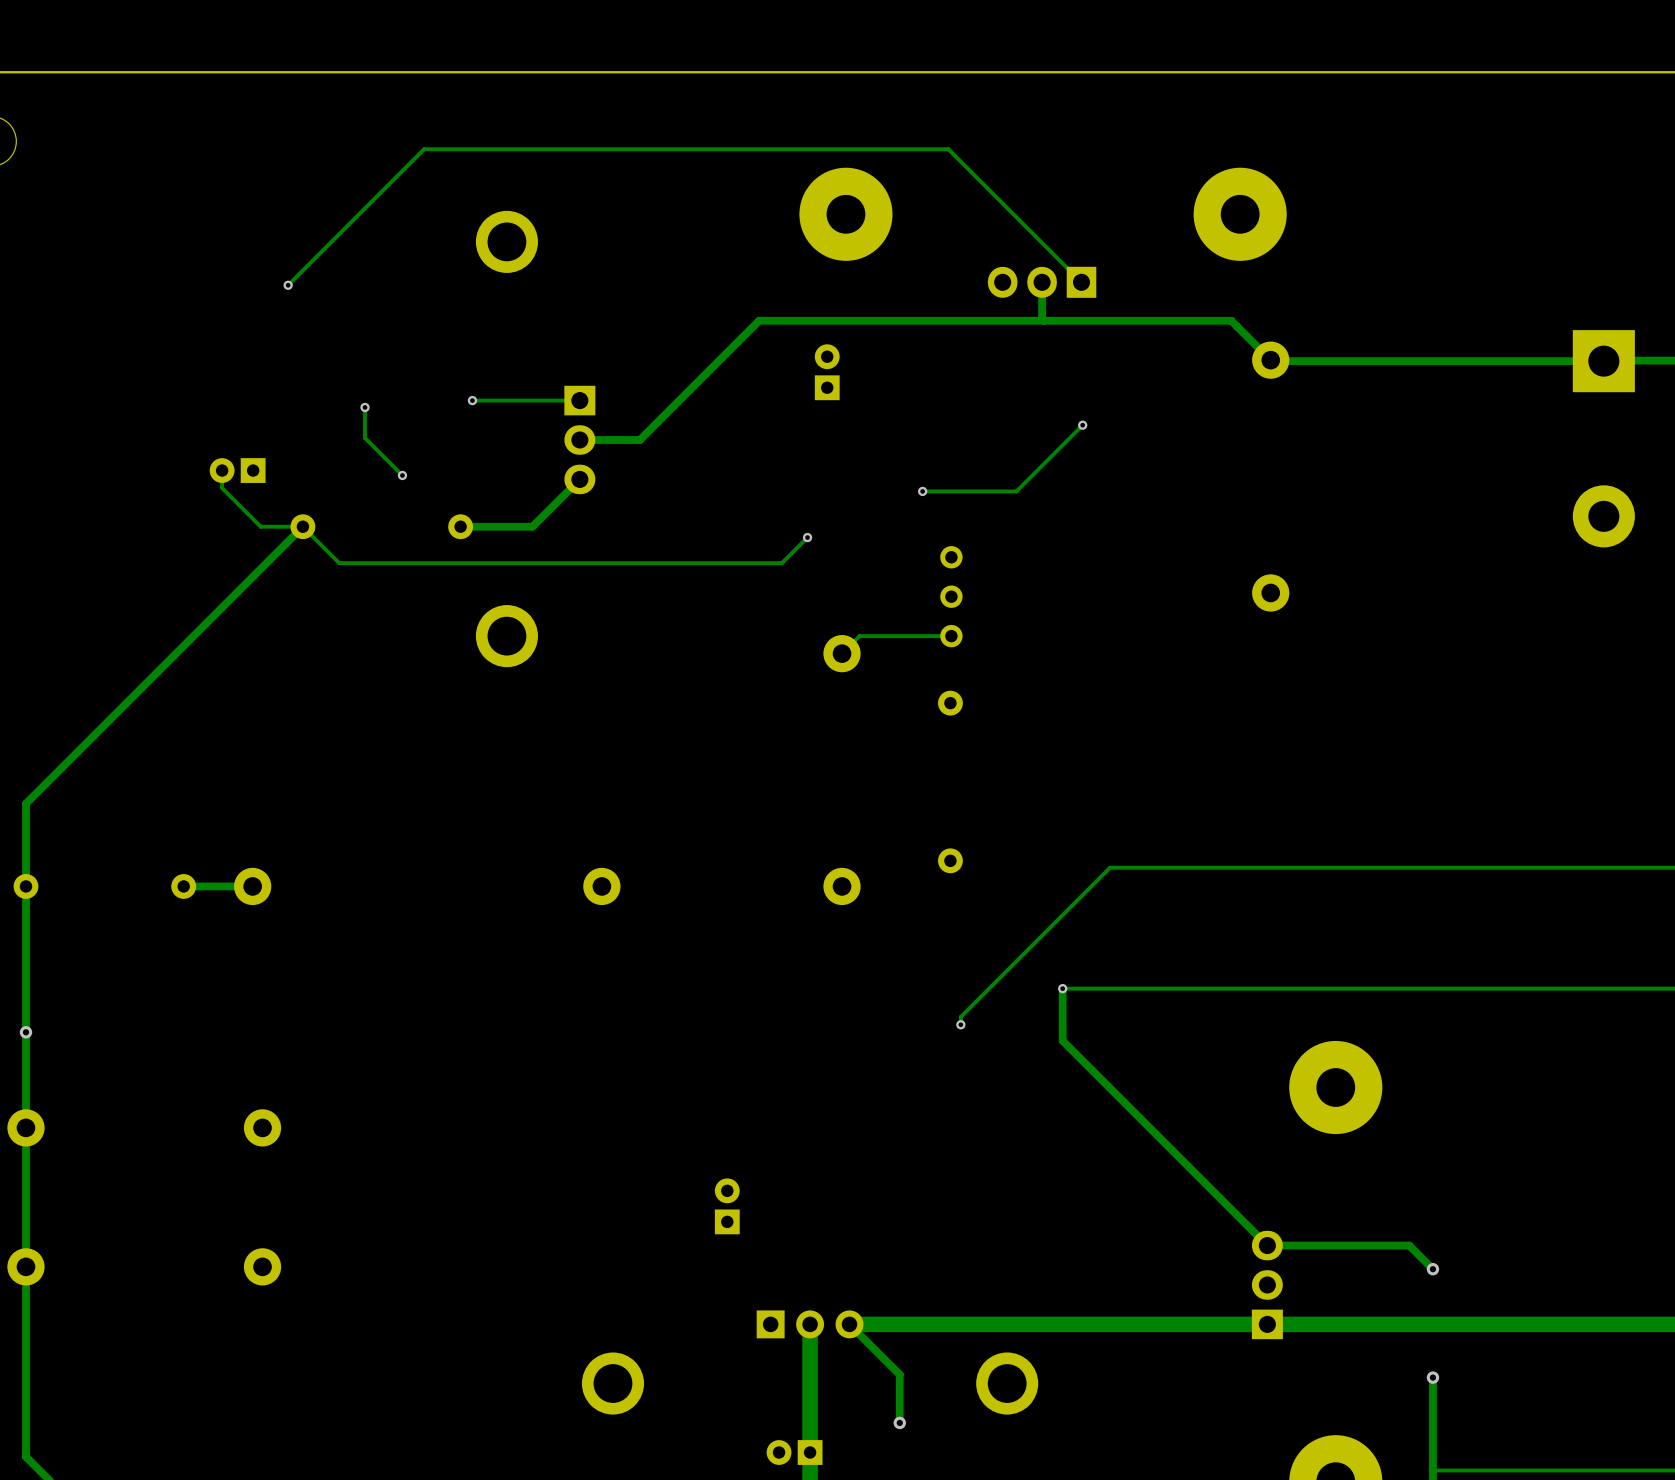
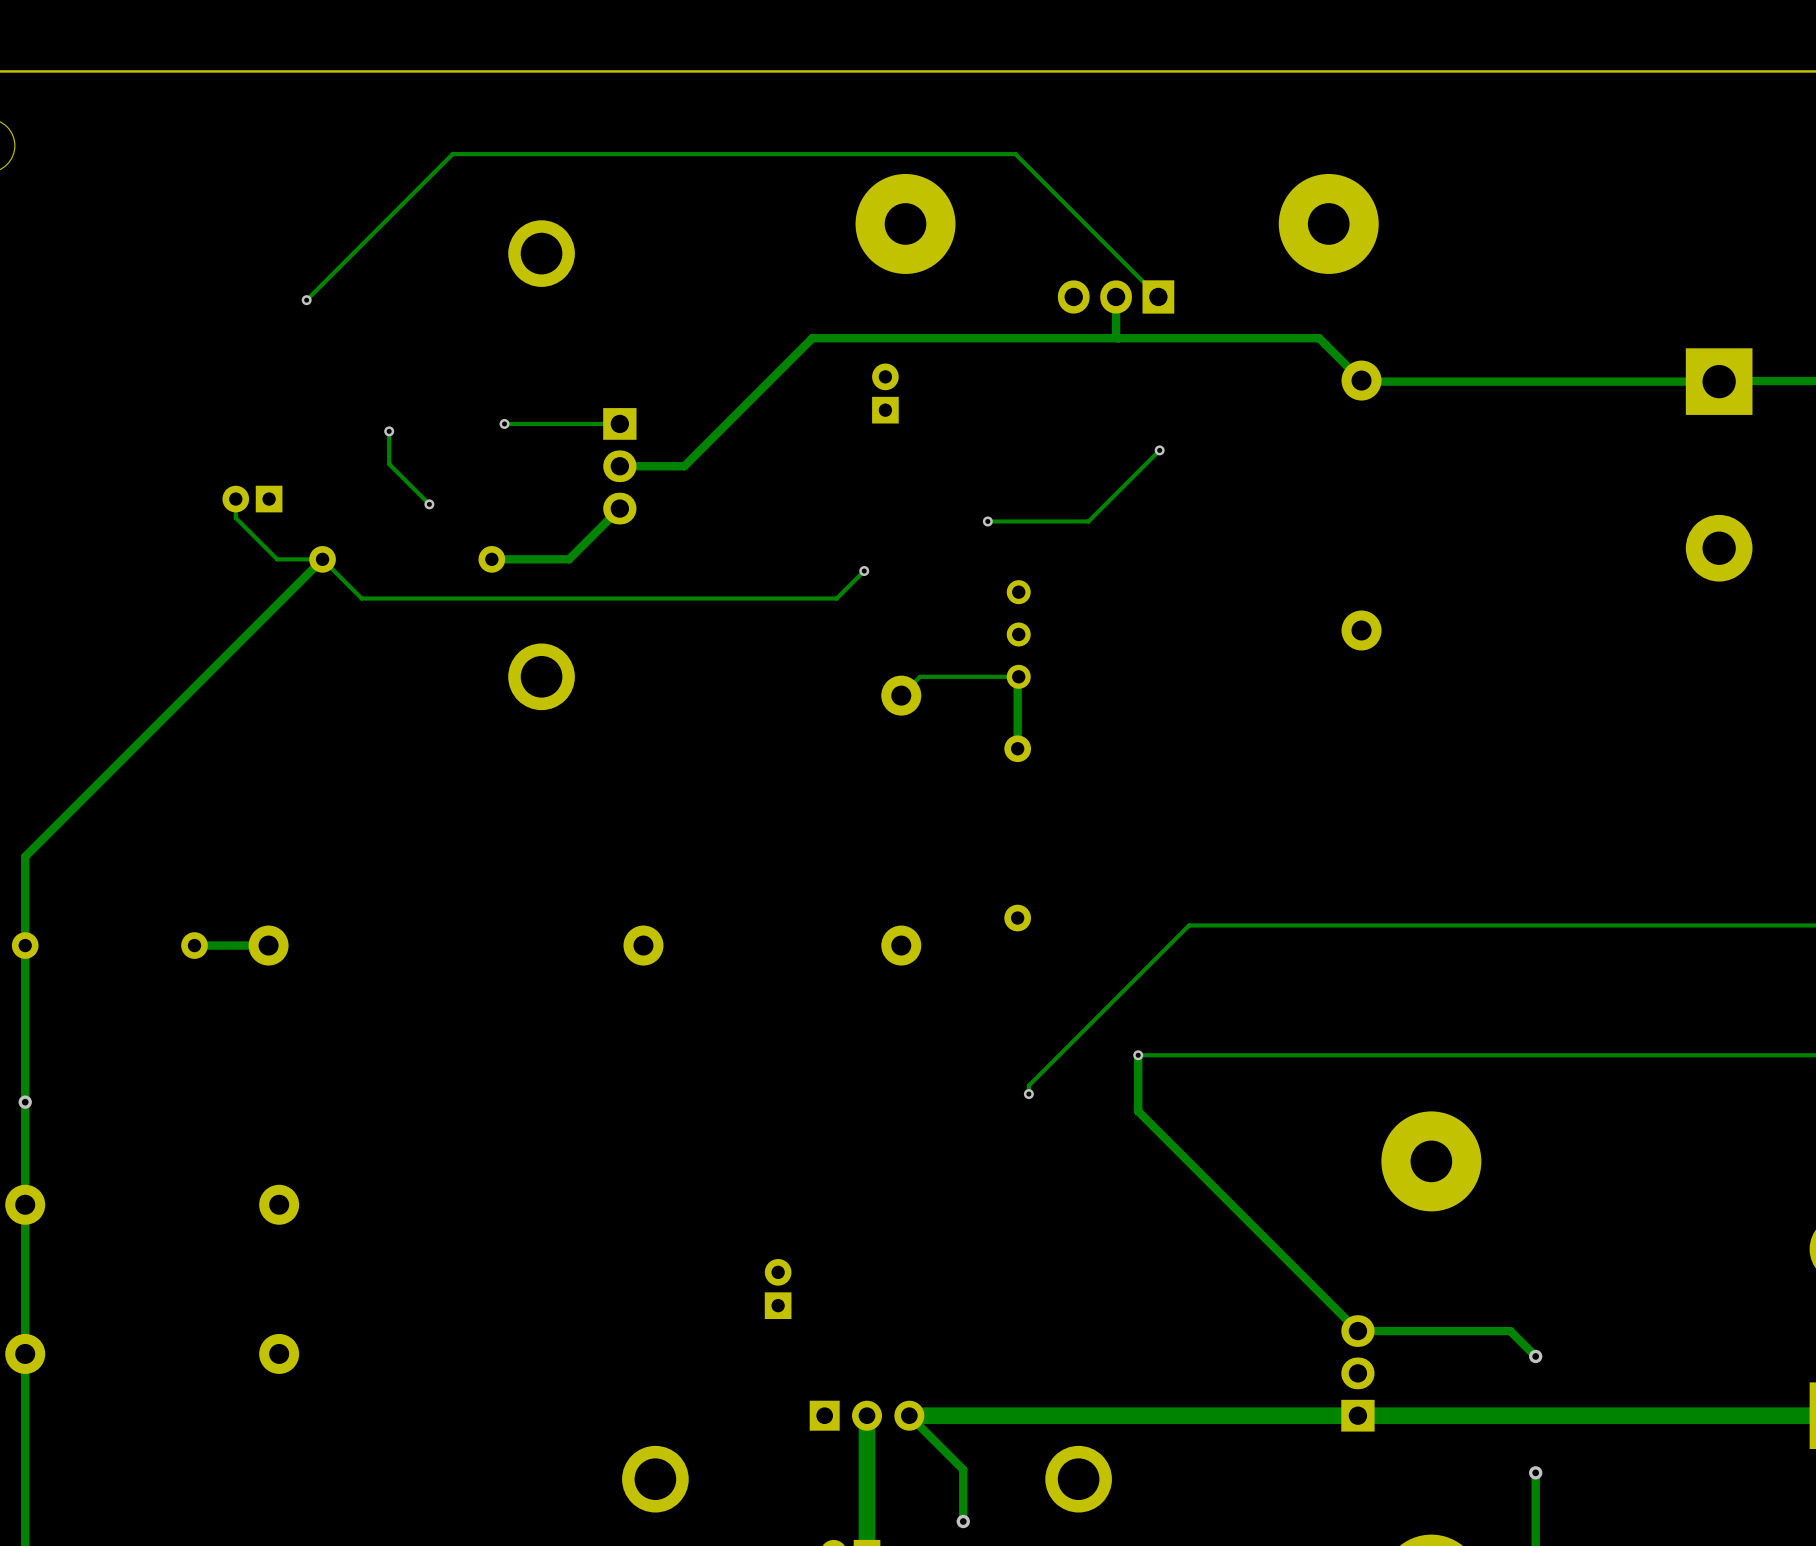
track: none -> (1018, 676) (1017, 748)

